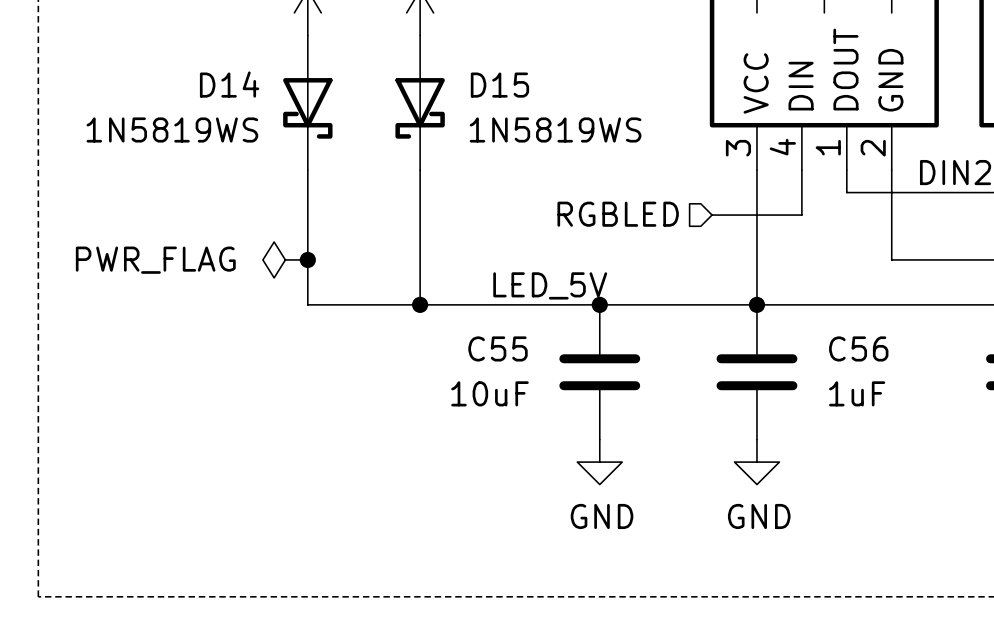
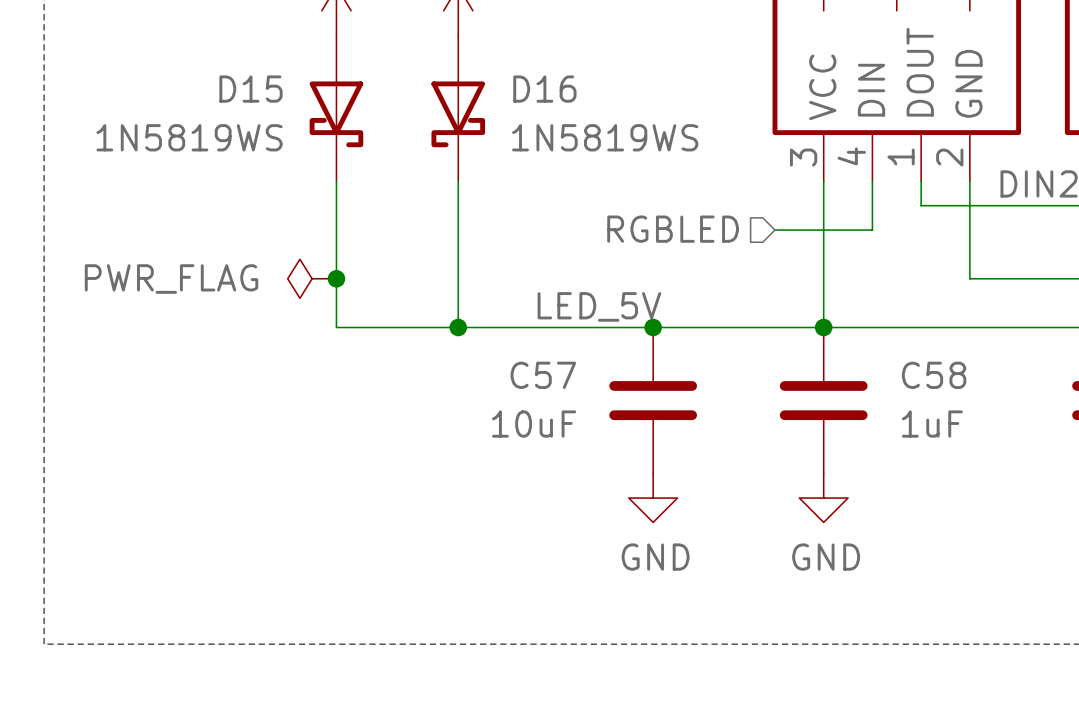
D14 name: D14 (229, 84) -> D15 (251, 89)
D15 name: D15 (499, 85) -> D16 (544, 89)
C55 name: C55 (498, 348) -> C57 (543, 375)
C56 name: C56 (858, 348) -> C58 (934, 375)

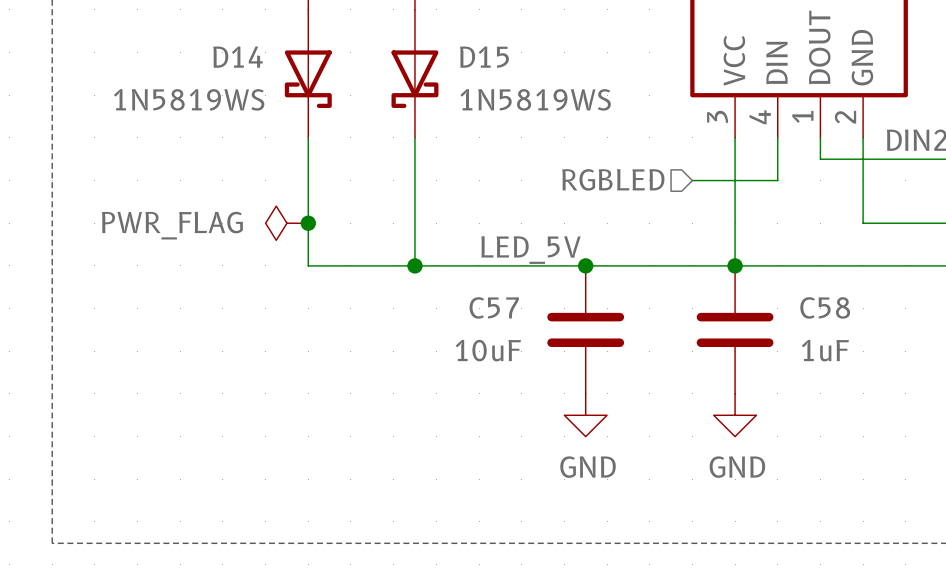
D15 name: D15 (251, 89) -> D14 (238, 57)
D16 name: D16 (544, 89) -> D15 (484, 57)

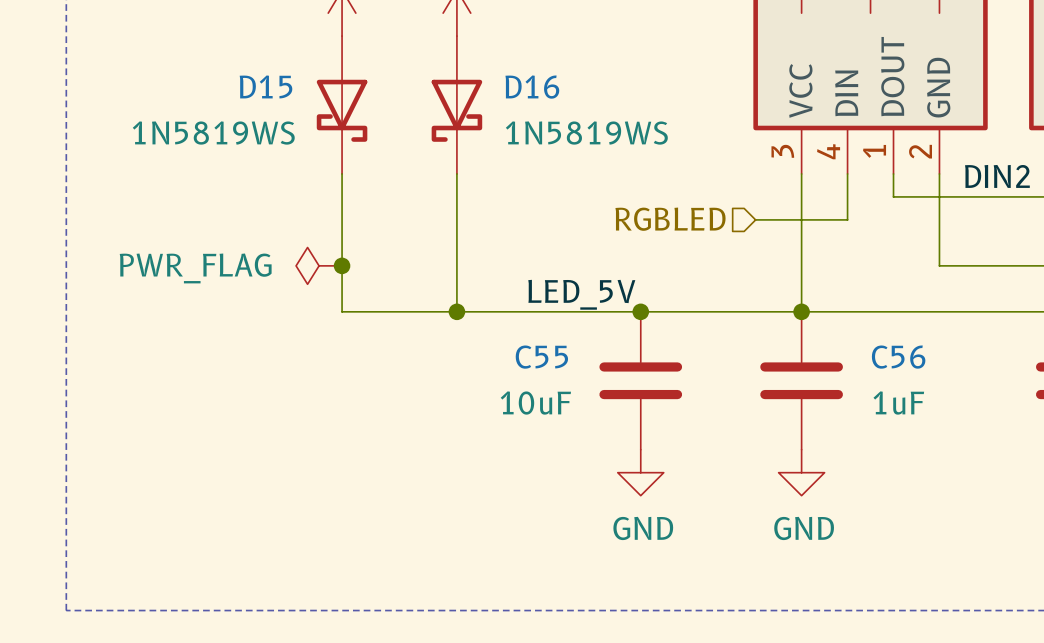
D14 name: D14 (238, 57) -> D15 (266, 86)
D15 name: D15 (484, 57) -> D16 (532, 87)
C57 name: C57 (494, 307) -> C55 (541, 357)
C58 name: C58 (825, 307) -> C56 (898, 357)

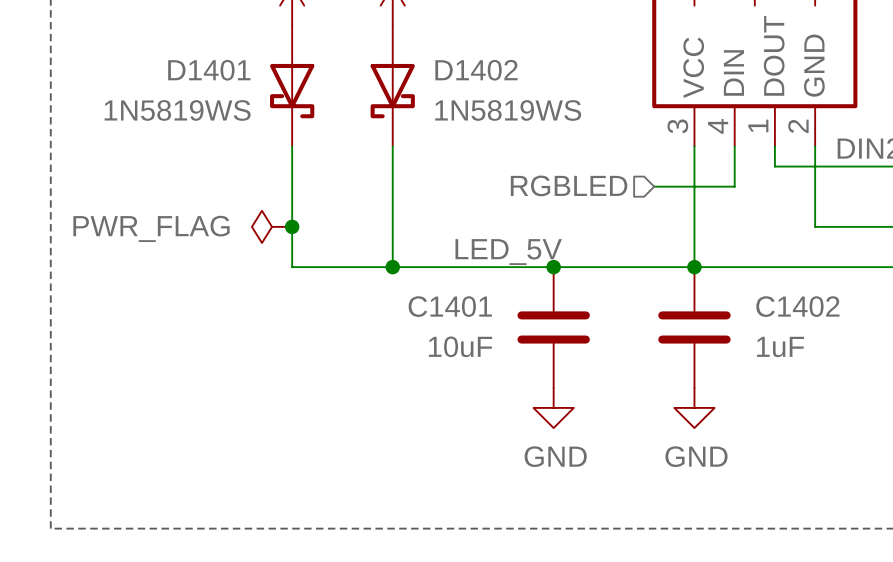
D15 name: D15 (266, 86) -> D1401 (209, 70)
D16 name: D16 (532, 87) -> D1402 (476, 70)
C55 name: C55 (541, 357) -> C1401 (450, 306)
C56 name: C56 (898, 357) -> C1402 (797, 306)

